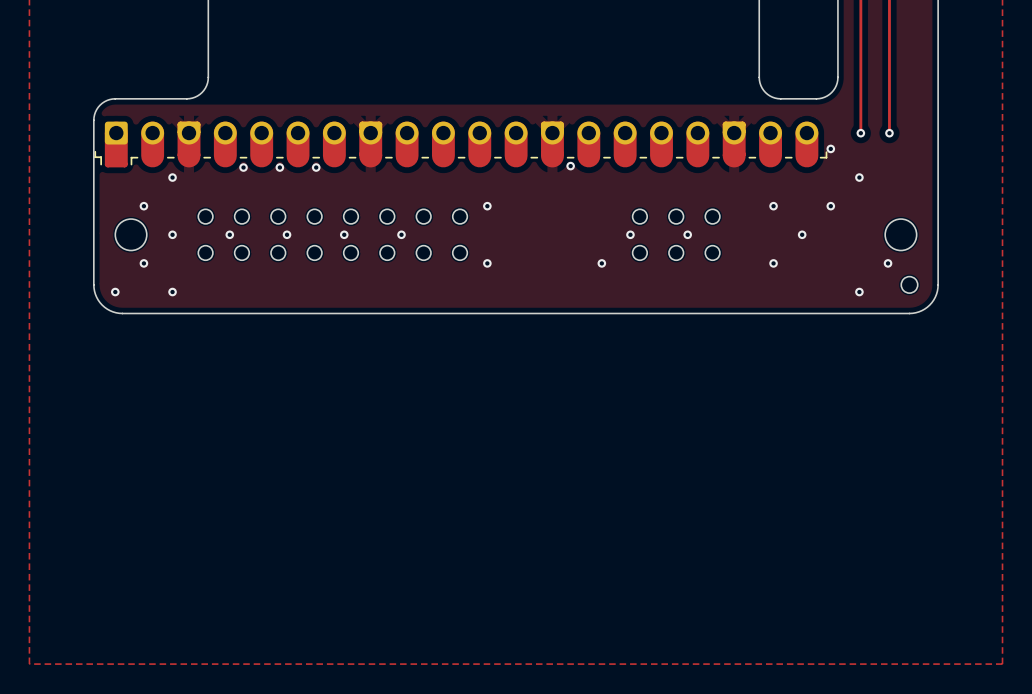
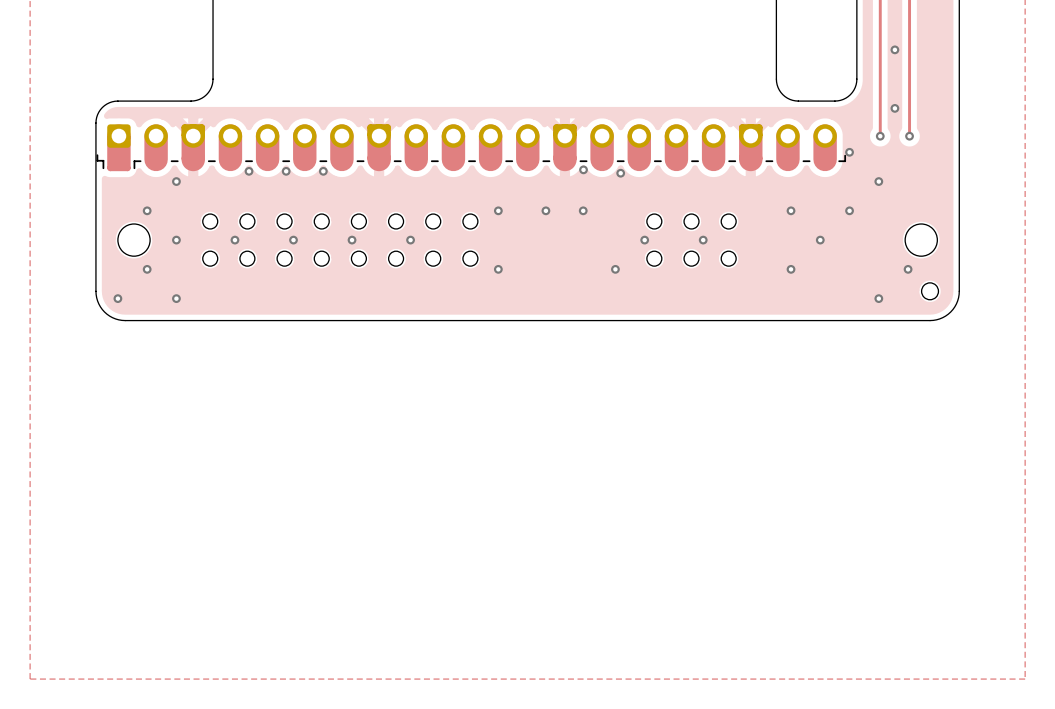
via: none -> (894, 49)
via: none -> (894, 108)
via: none -> (620, 173)
via: none -> (545, 210)
via: none -> (583, 210)

